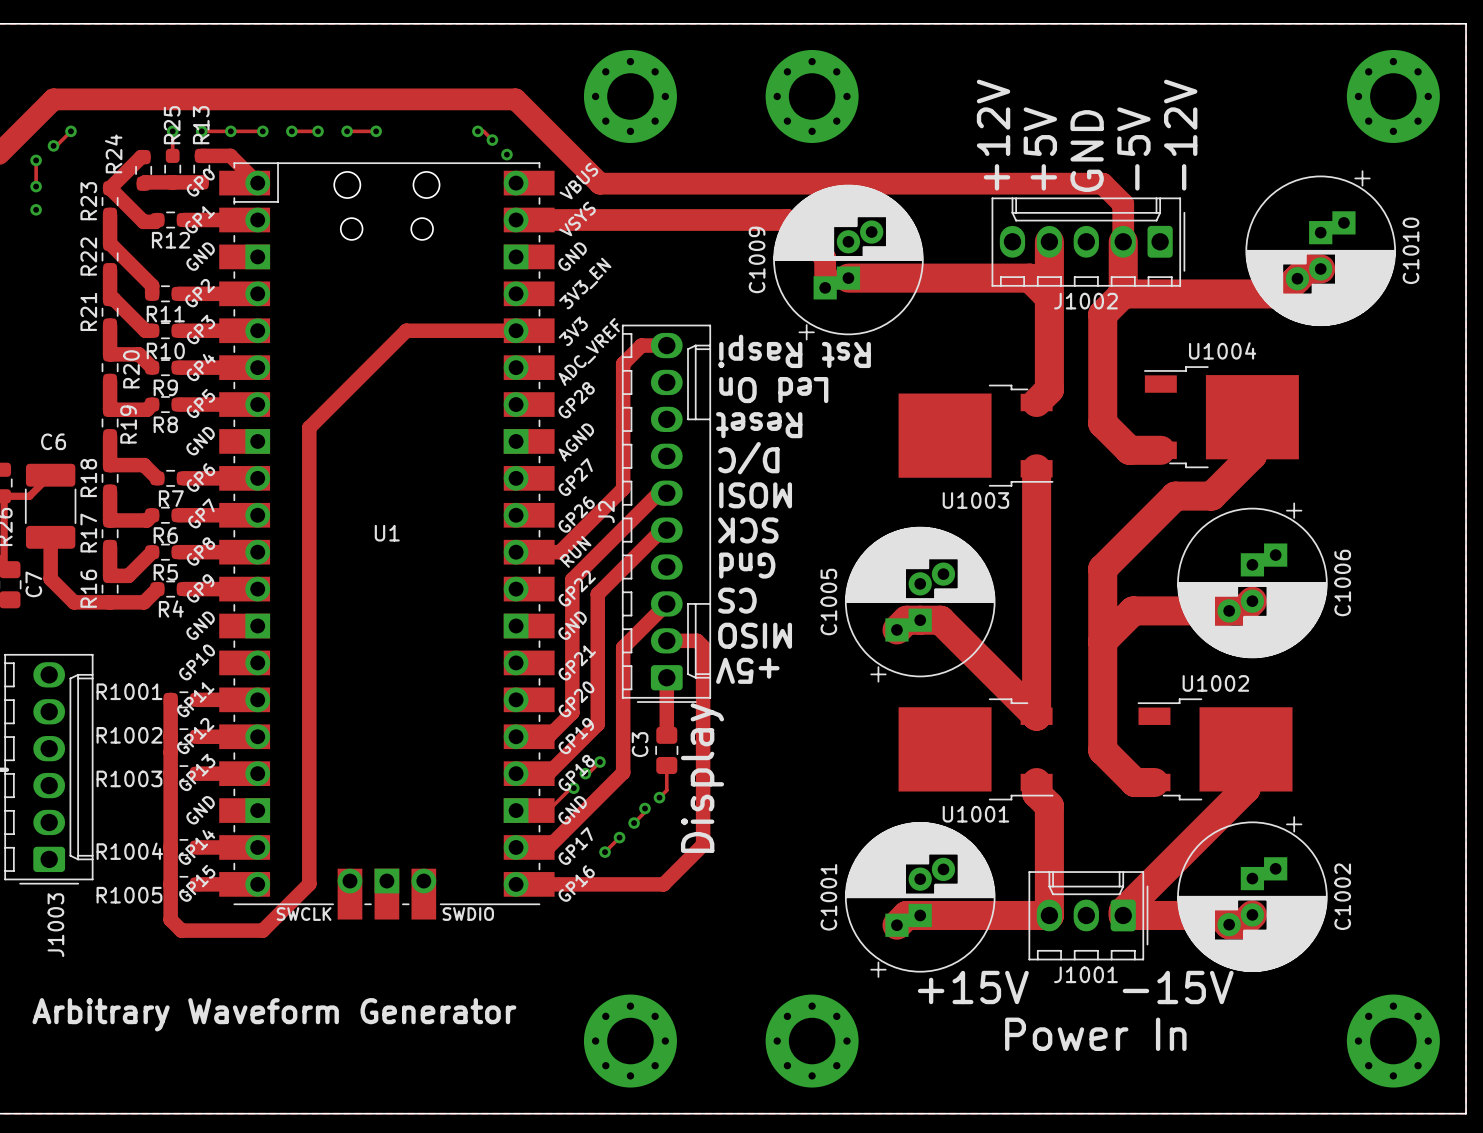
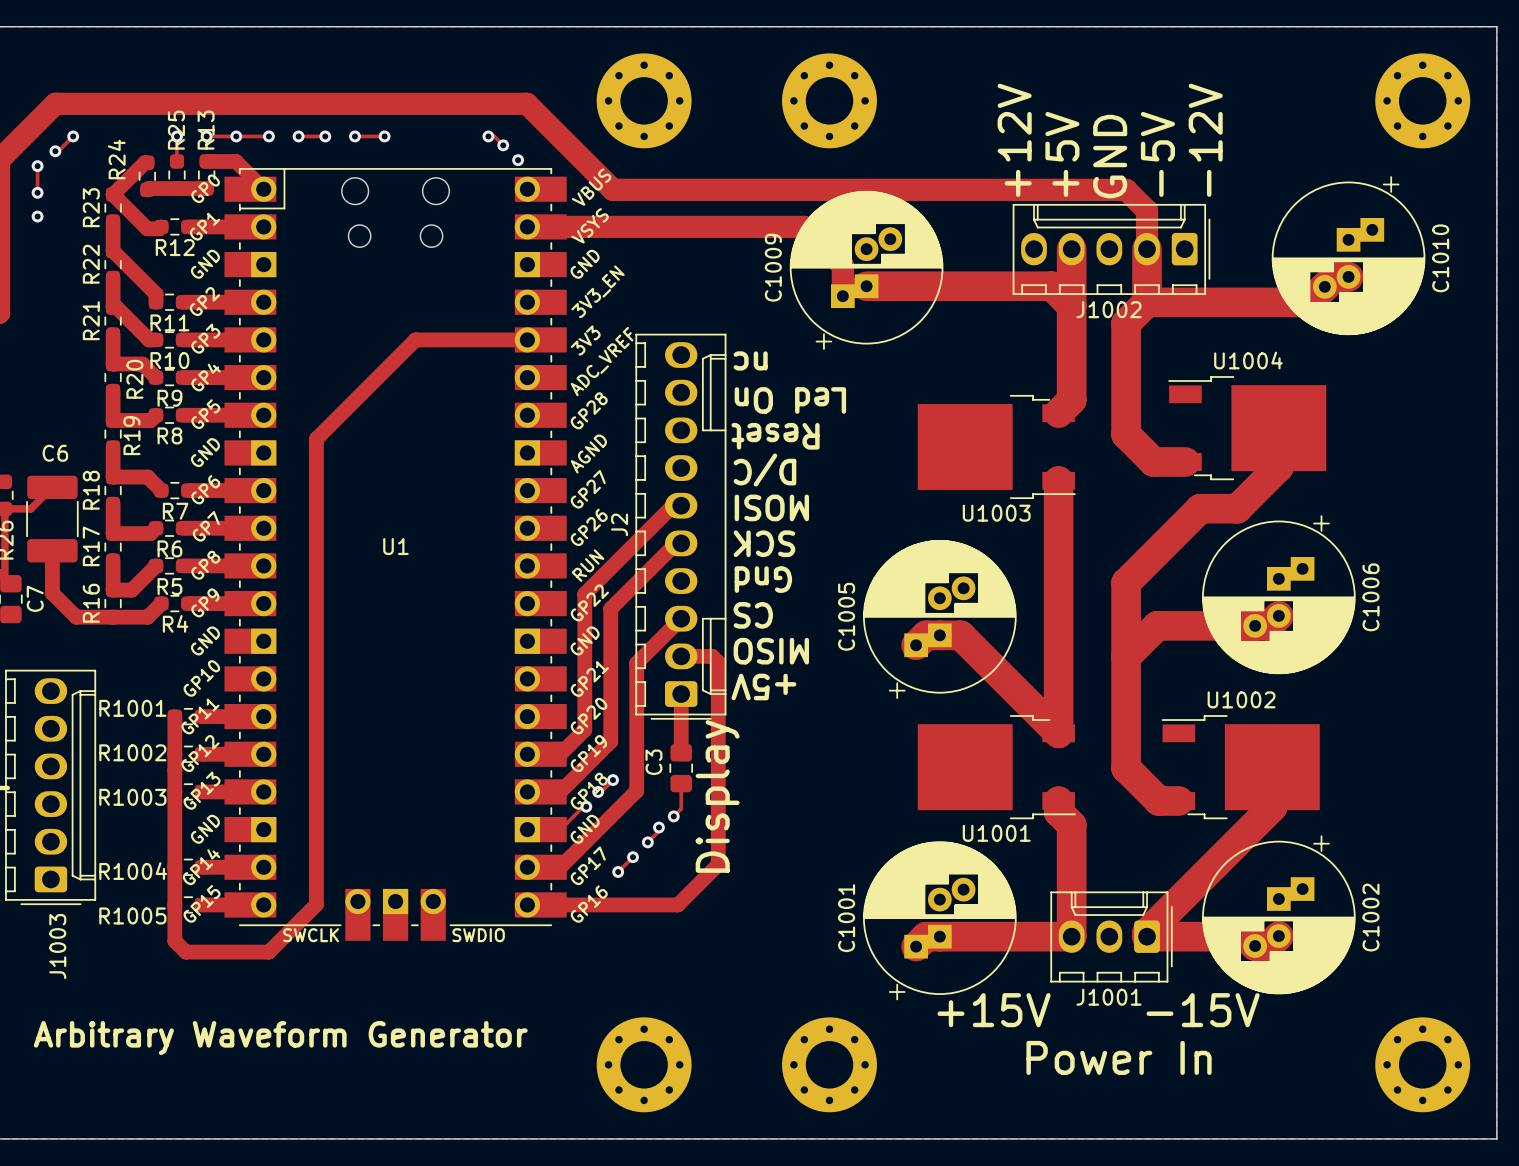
track: (666, 345) (641, 345) (623, 363) (623, 488) (559, 552) (516, 552) -> none
text: Rst Raspi (794, 351) -> nc (750, 360)

